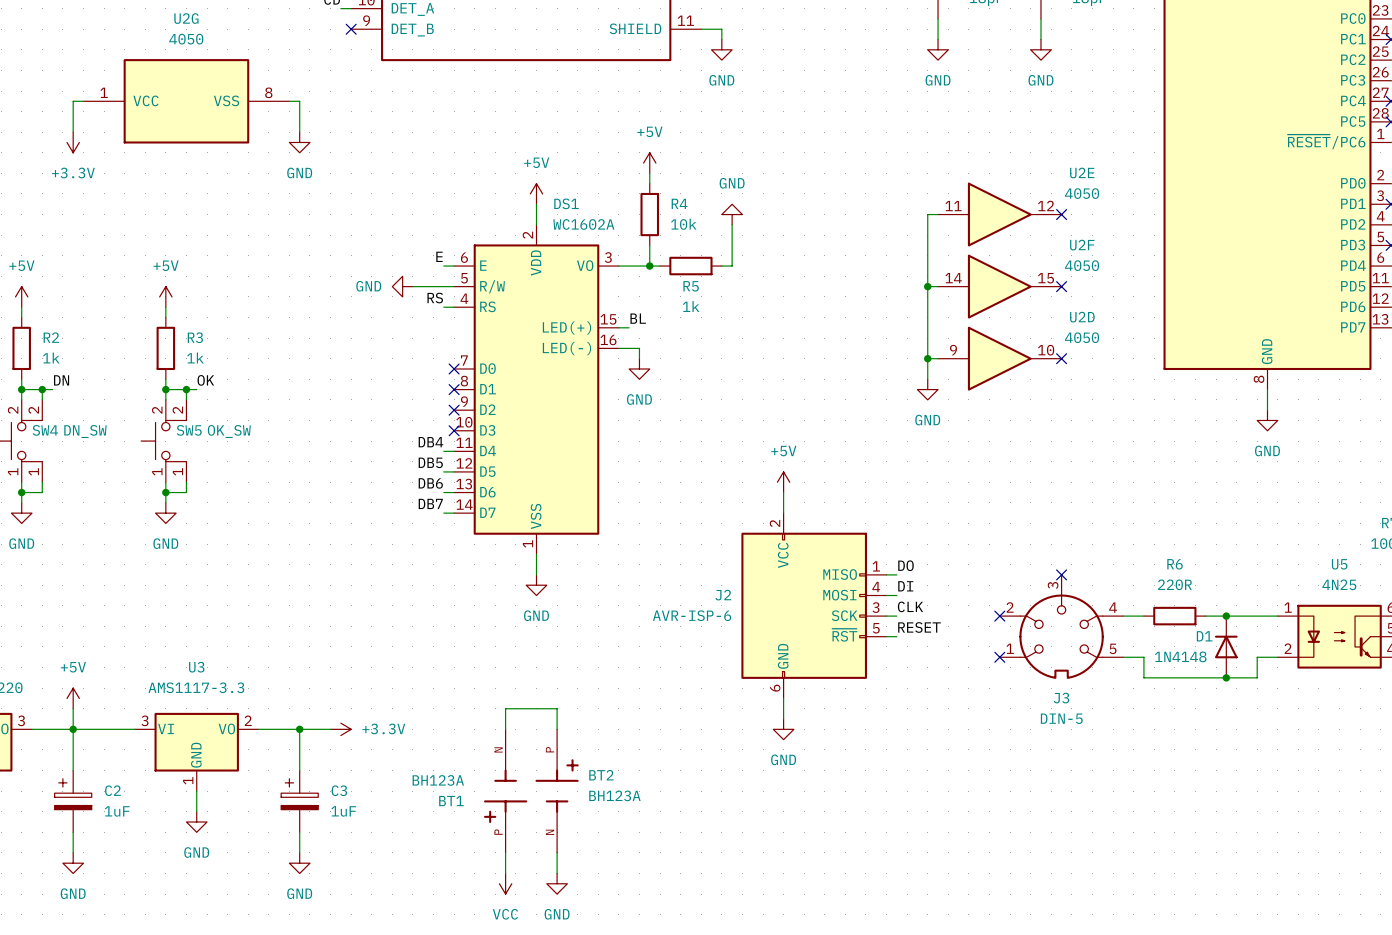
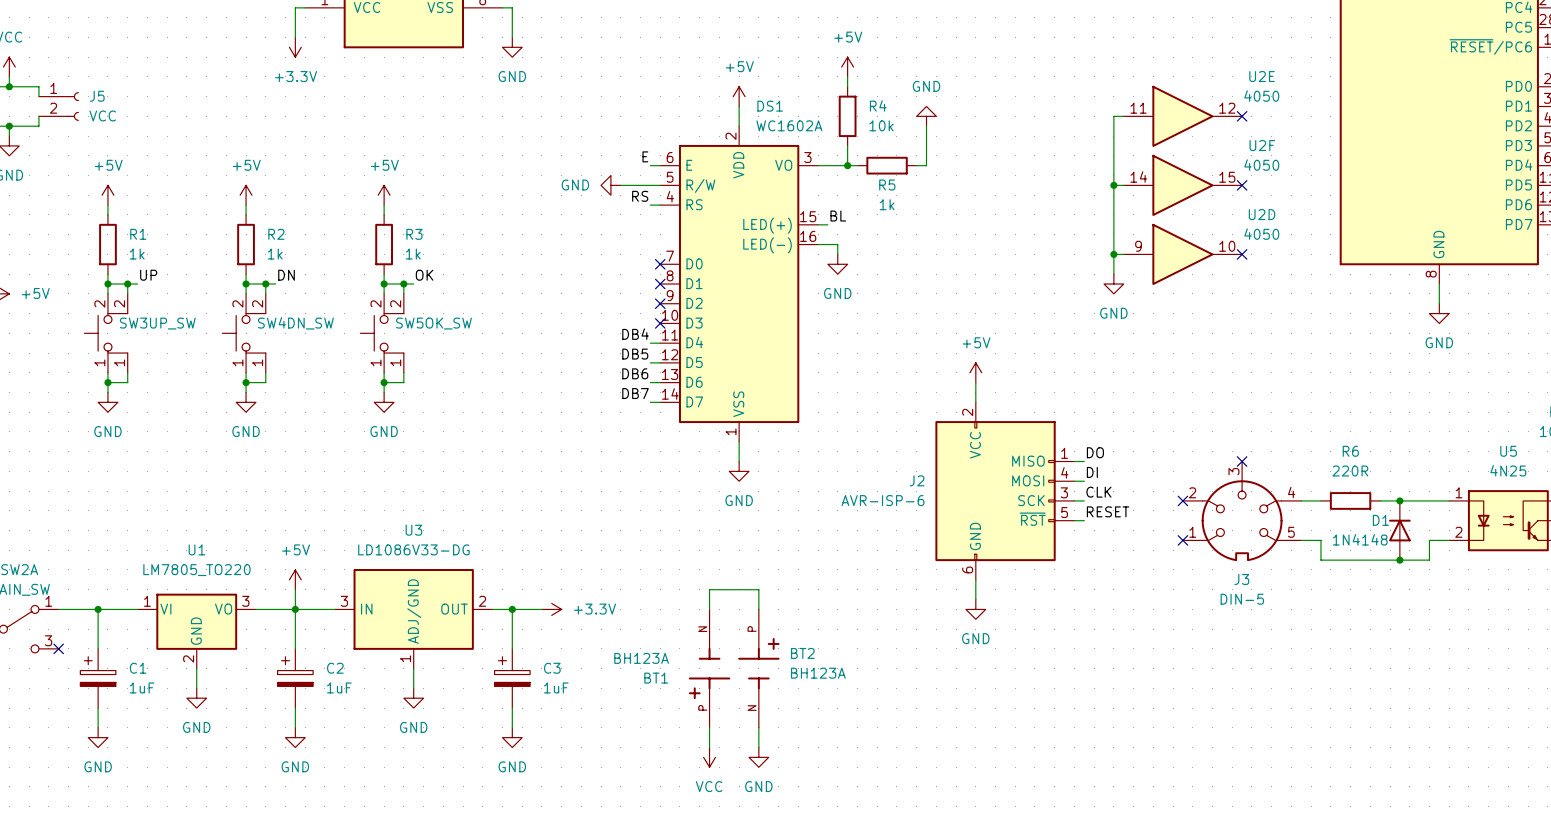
U3 value: AMS1117-3.3 (196, 687) -> LD1086V33-DG (413, 549)
U3 symbol: [134, 712, 259, 792] -> [334, 569, 493, 669]

